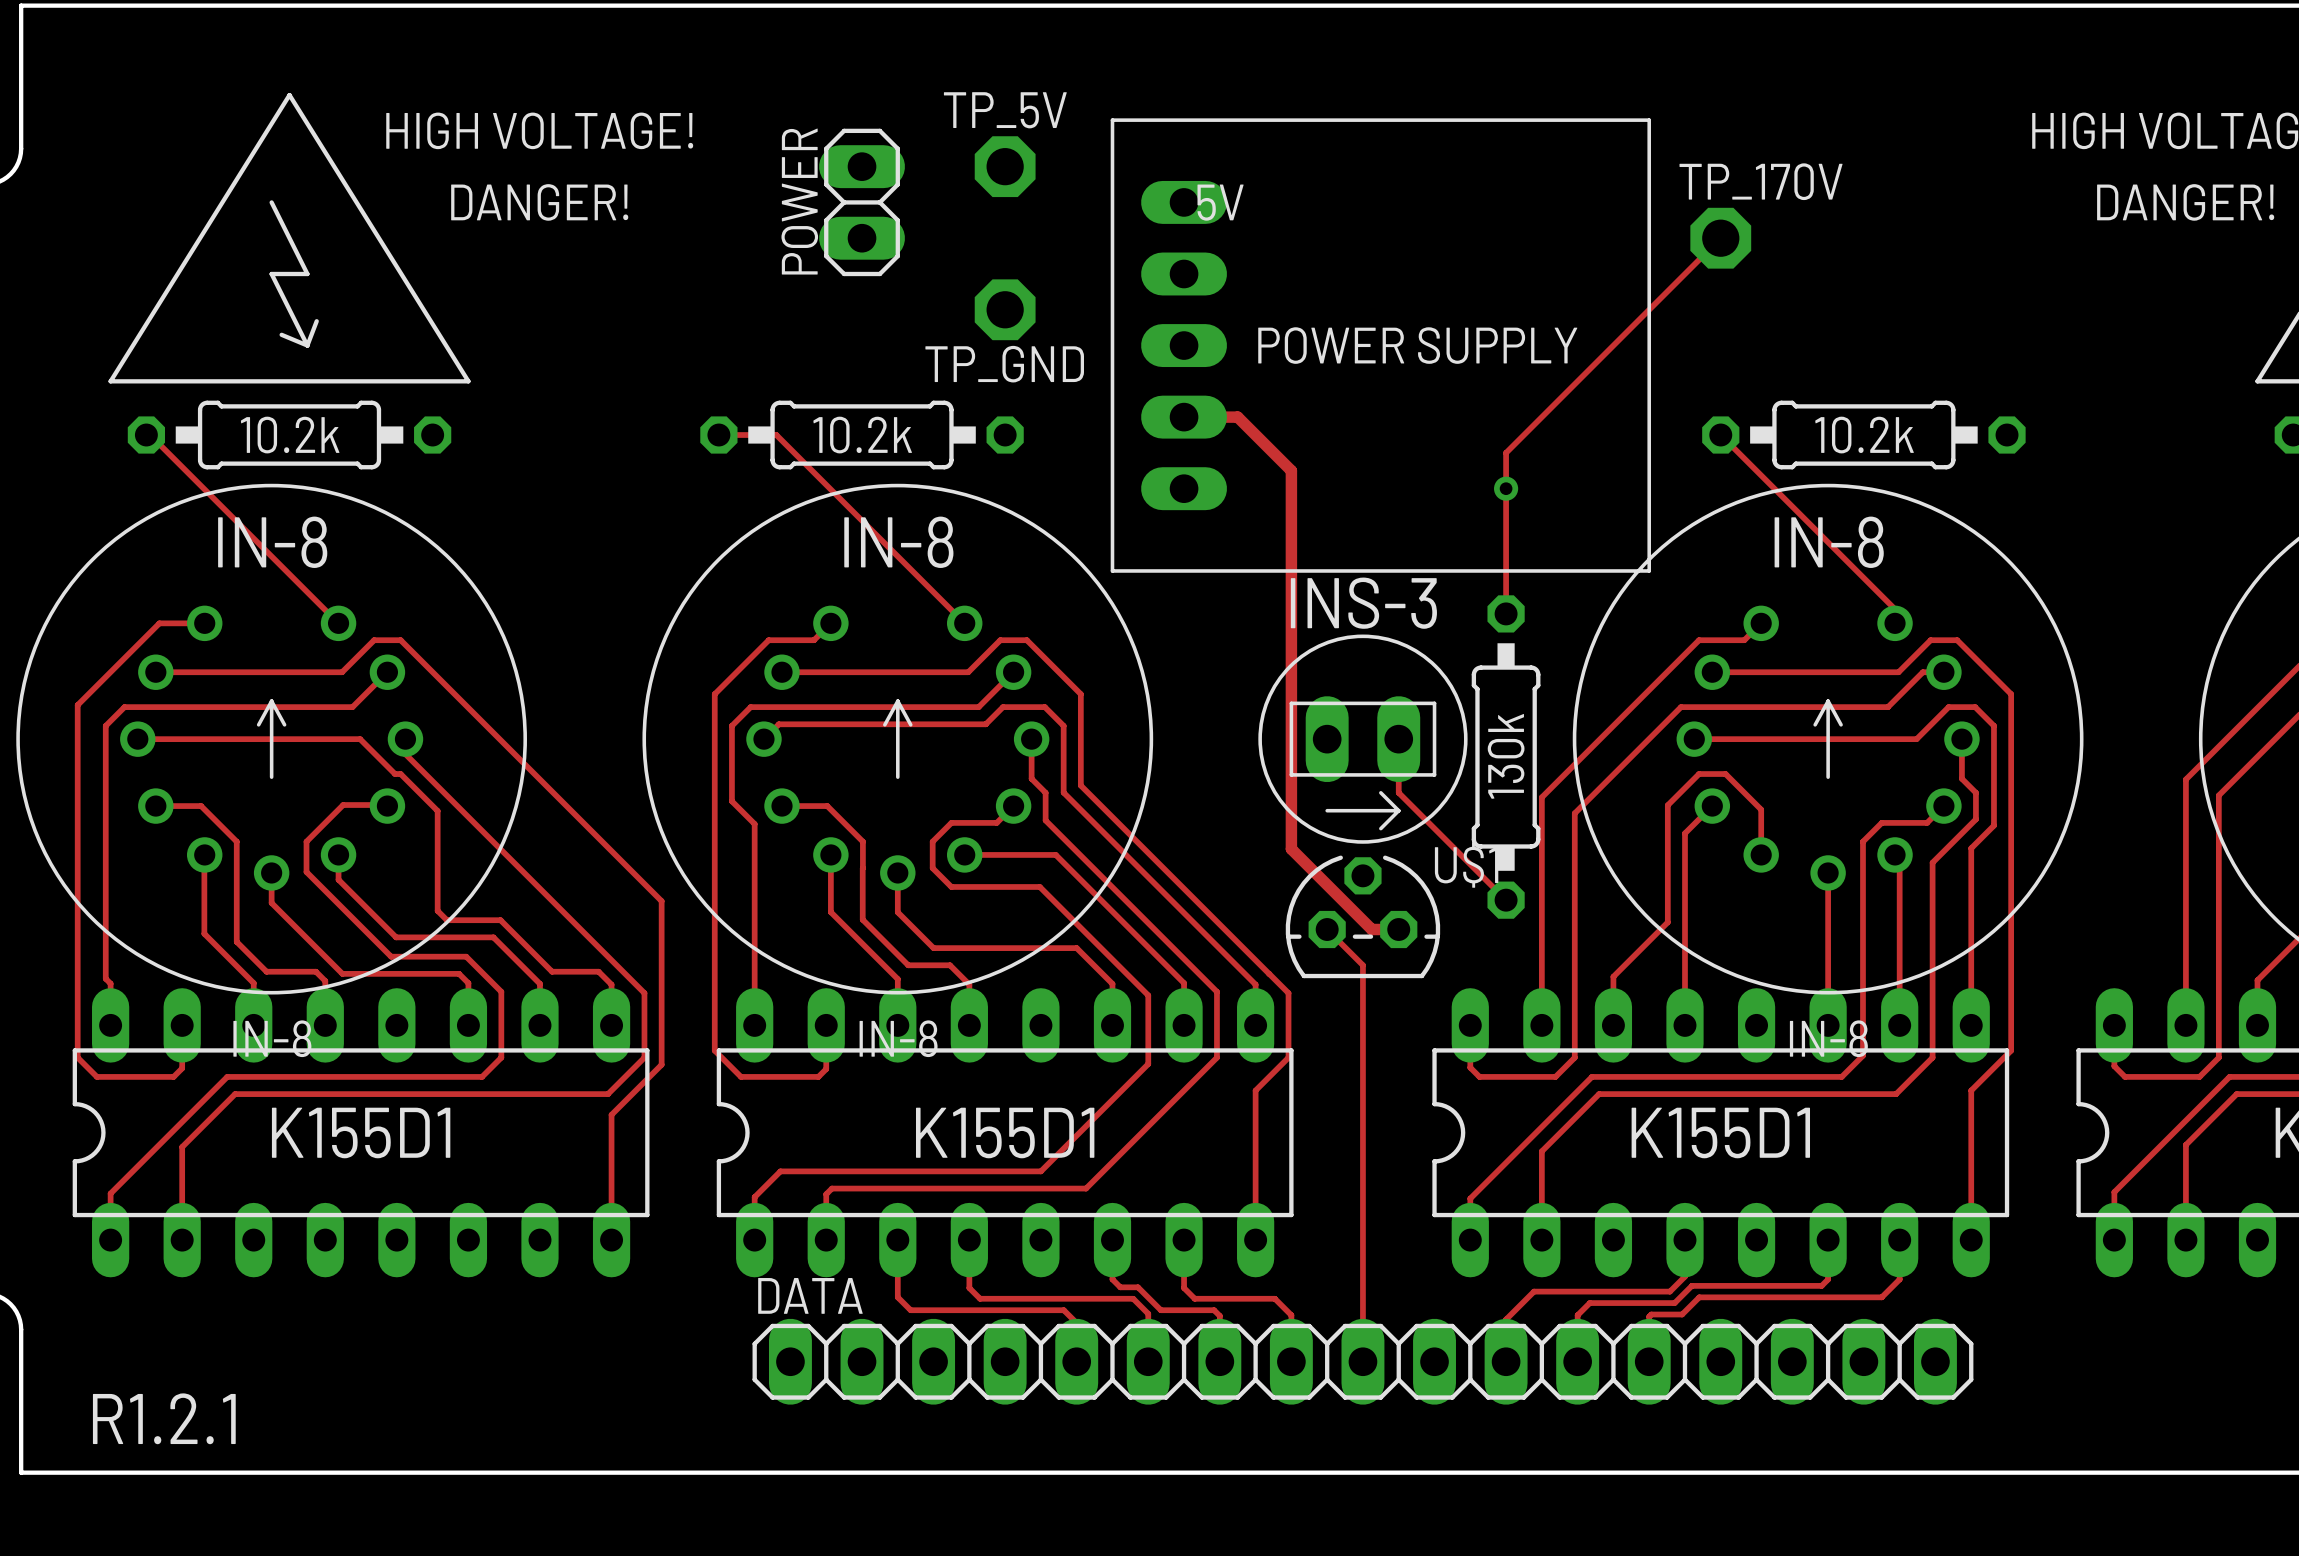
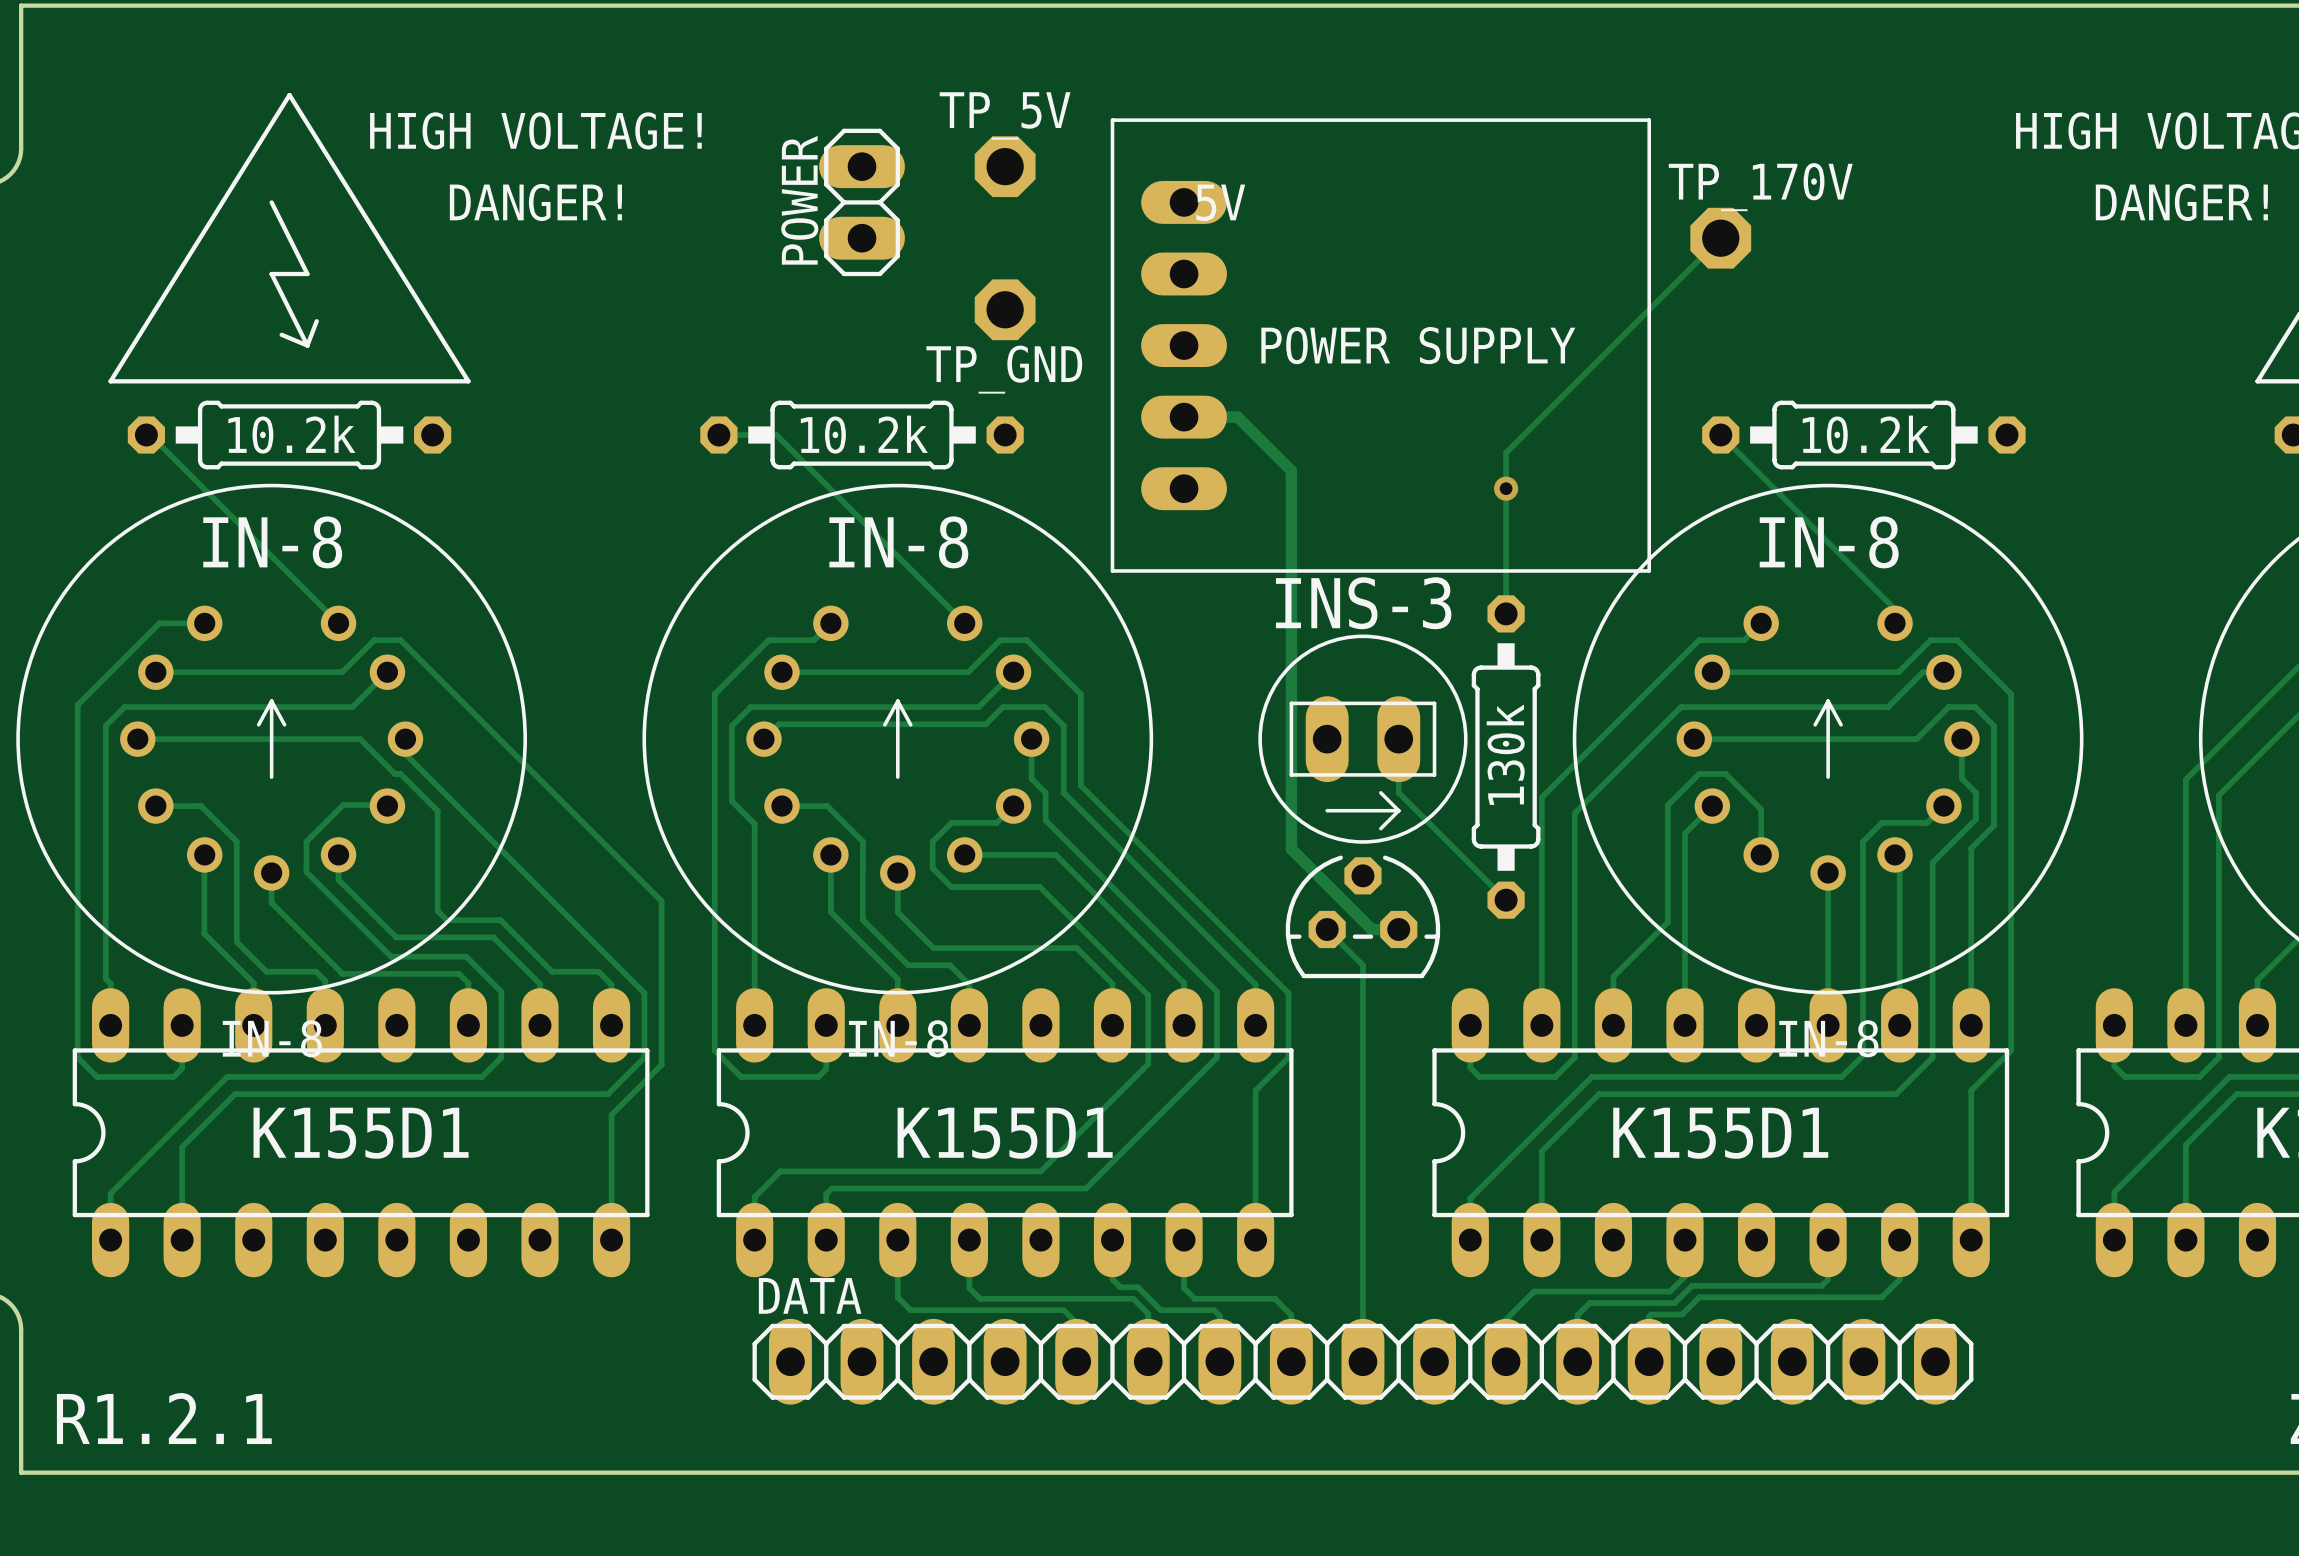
U$1 name: U$1 (1466, 864) -> none

